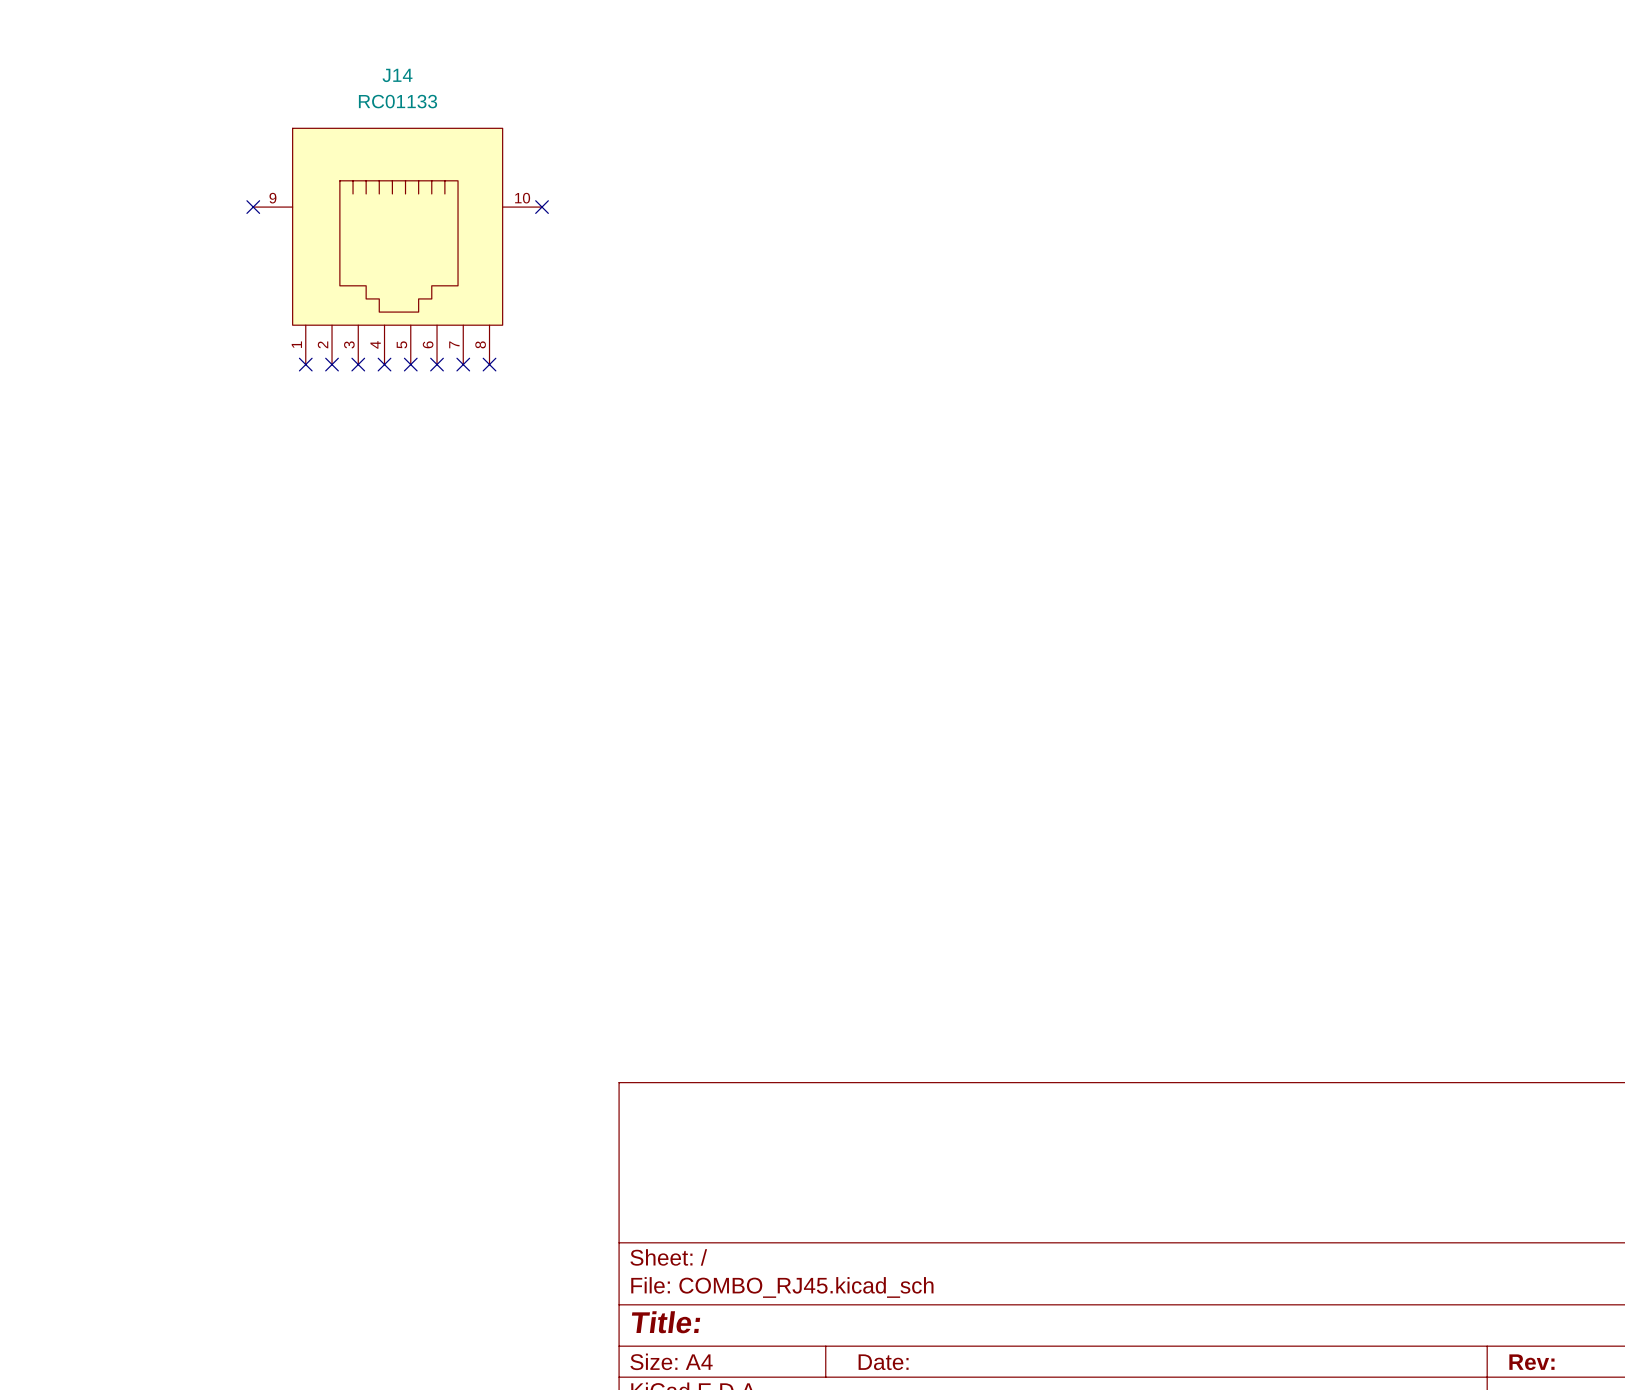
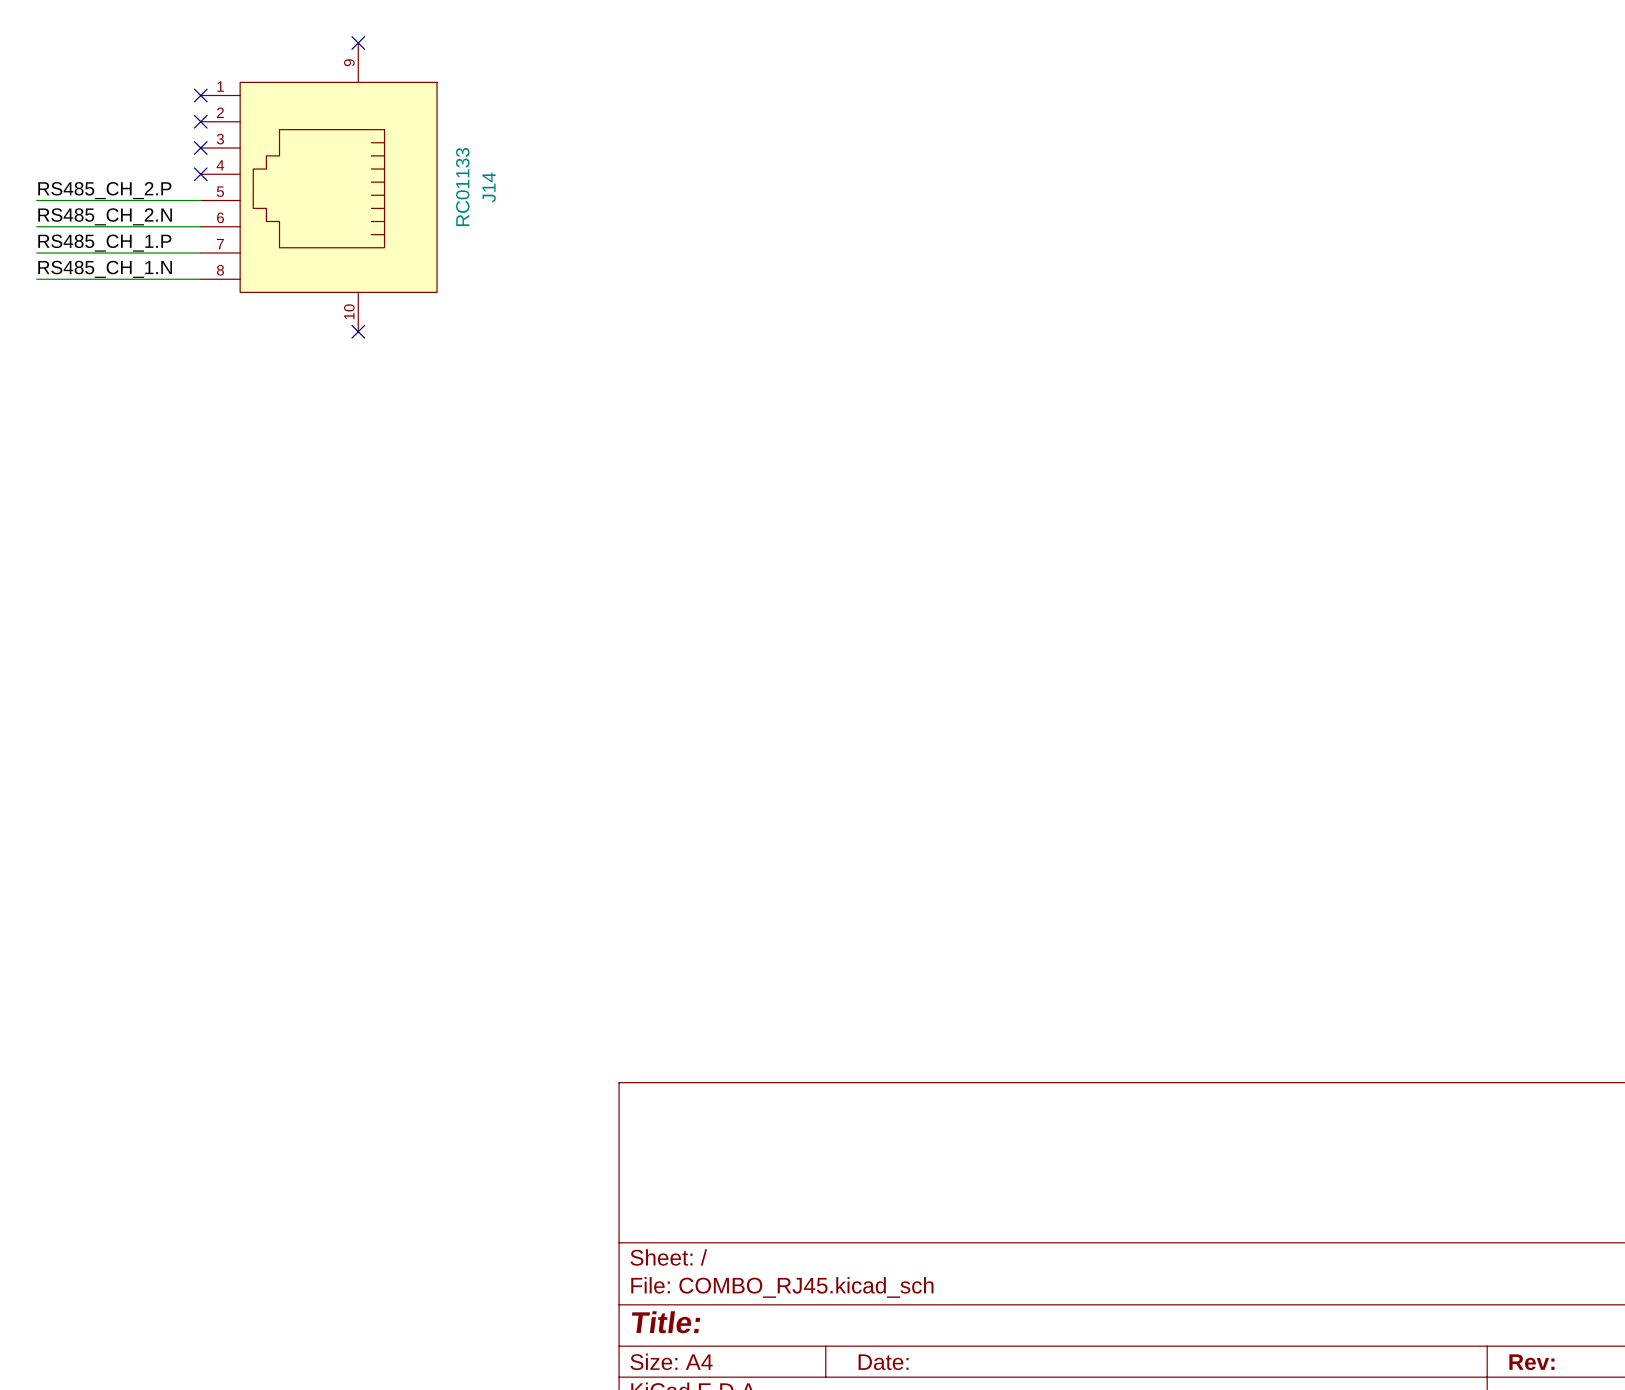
no-connect mark: none -> (358, 43)
no-connect mark: none -> (200, 95)
no-connect mark: none -> (200, 121)
no-connect mark: none -> (200, 148)
no-connect mark: none -> (200, 174)
label: none -> RS485_CH_2.P (104, 190)
wire: none -> (36, 200) (200, 200)
no-connect mark: (253, 207) -> none
no-connect mark: (542, 207) -> none
label: none -> RS485_CH_2.N (105, 216)
wire: none -> (36, 226) (200, 226)
J14 rotation: 0° (397, 226) -> 90° clockwise (338, 187)
label: none -> RS485_CH_1.P (104, 243)
wire: none -> (36, 253) (200, 253)
label: none -> RS485_CH_1.N (105, 269)
wire: none -> (36, 279) (200, 279)
no-connect mark: none -> (358, 331)
no-connect mark: (305, 364) -> none
no-connect mark: (332, 364) -> none
no-connect mark: (358, 364) -> none
no-connect mark: (384, 364) -> none
no-connect mark: (410, 364) -> none
no-connect mark: (437, 364) -> none
no-connect mark: (463, 364) -> none
no-connect mark: (489, 364) -> none

